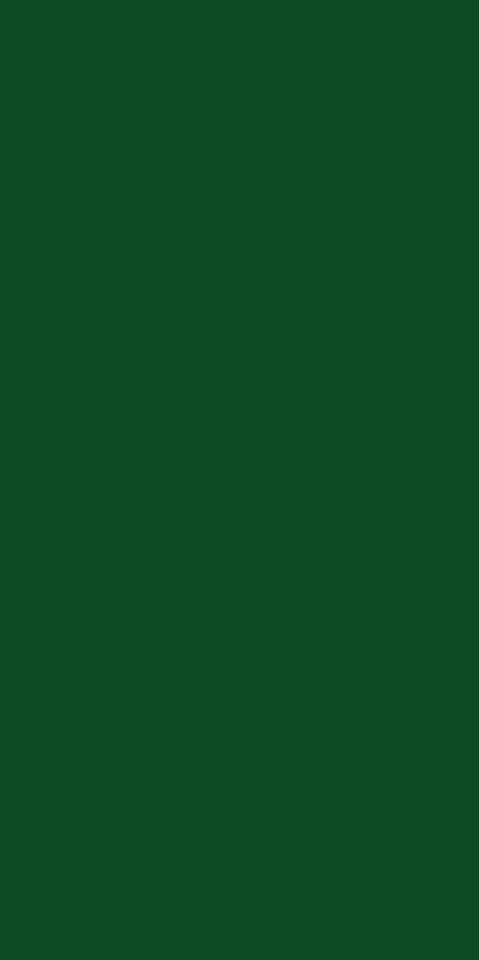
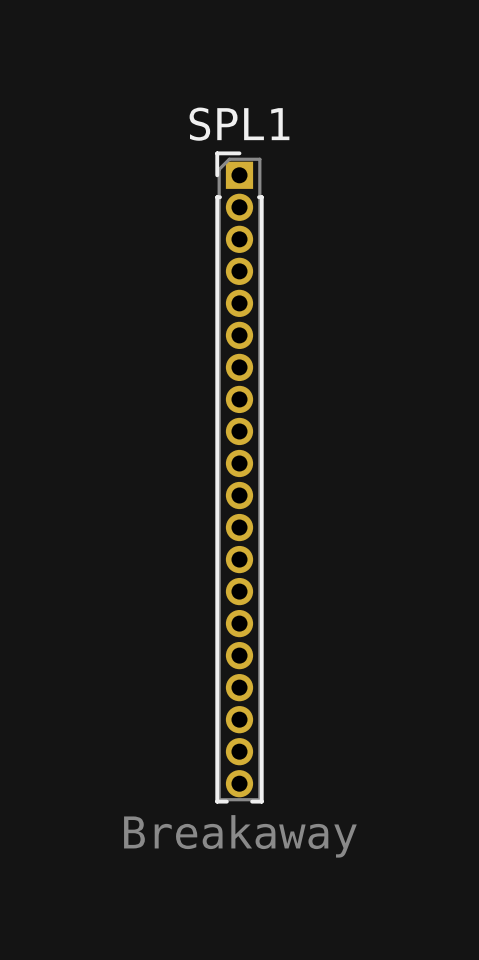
SPL1: none -> Breakaway (239, 477)

